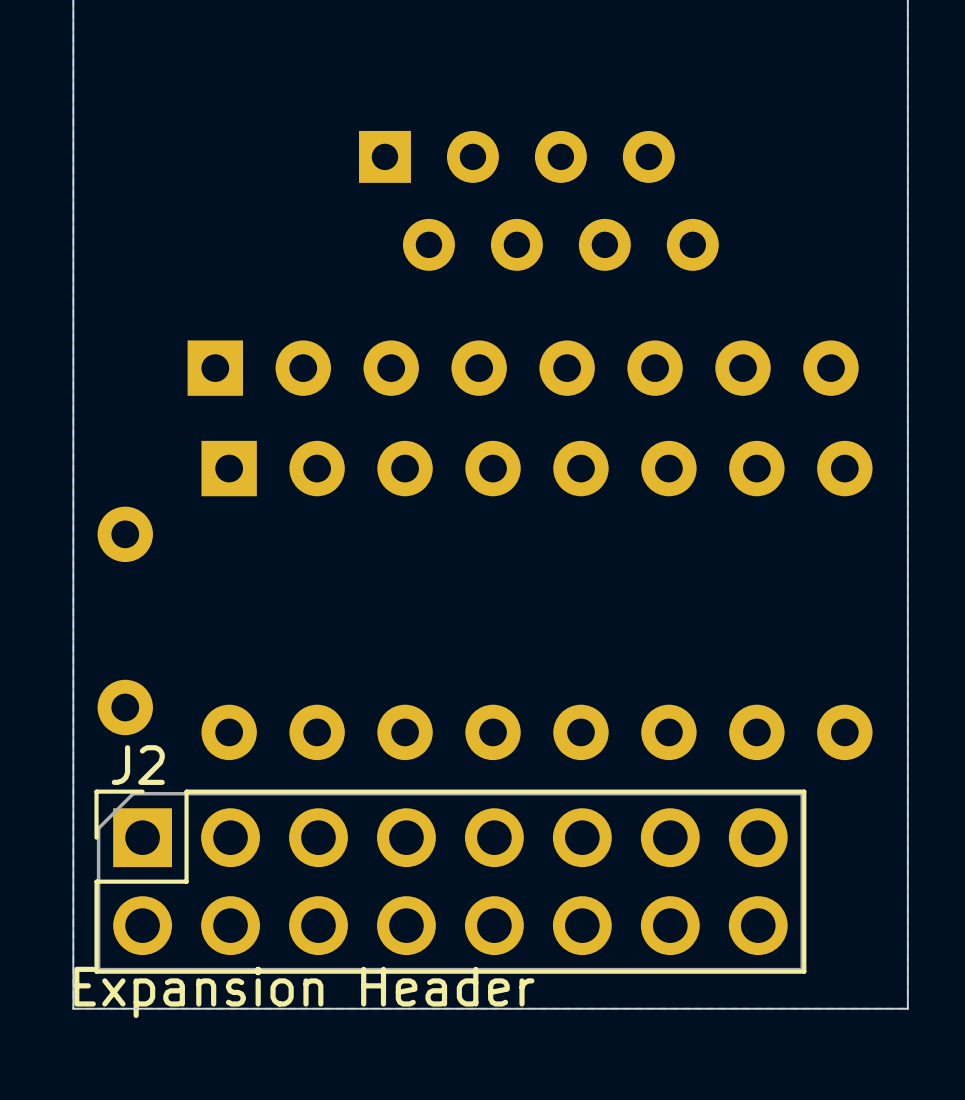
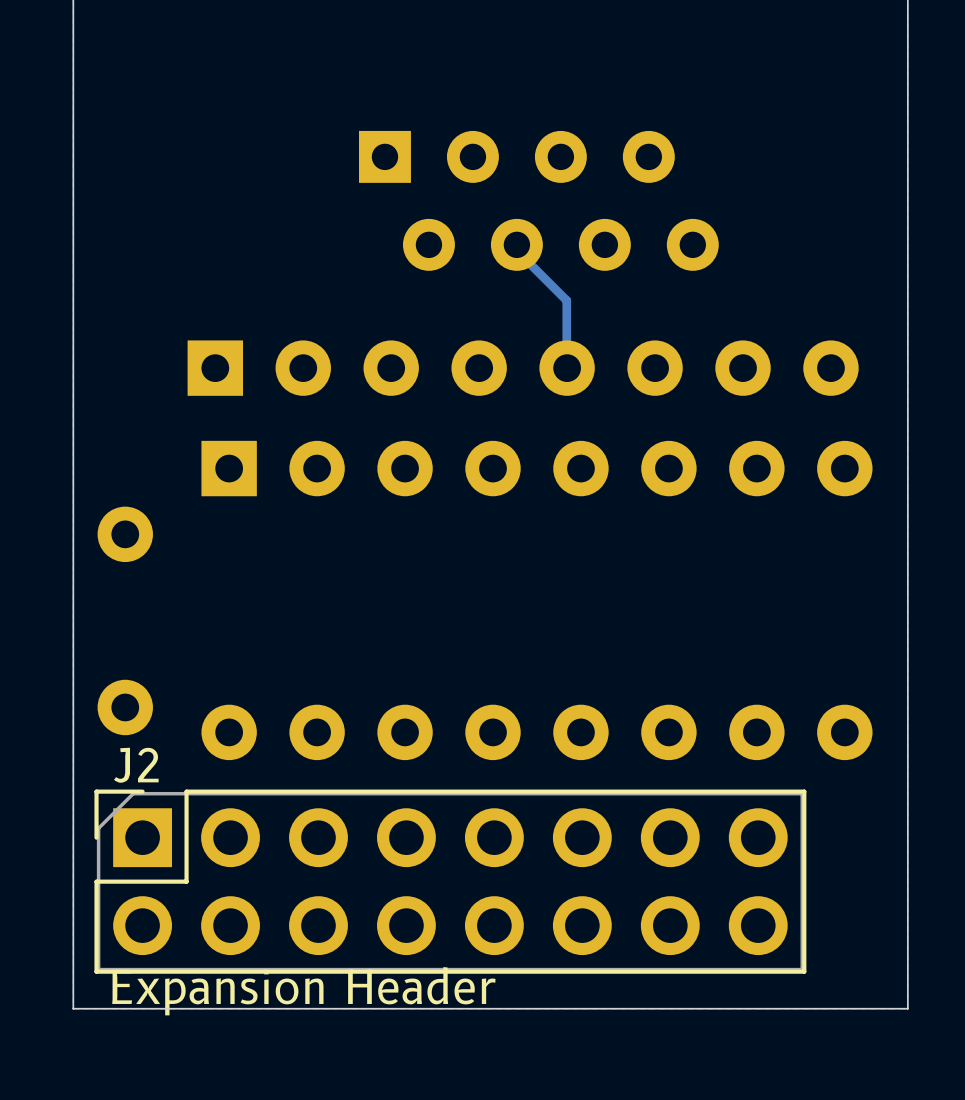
track: none -> (516, 244) (516, 250) (566, 300) (566, 367)

